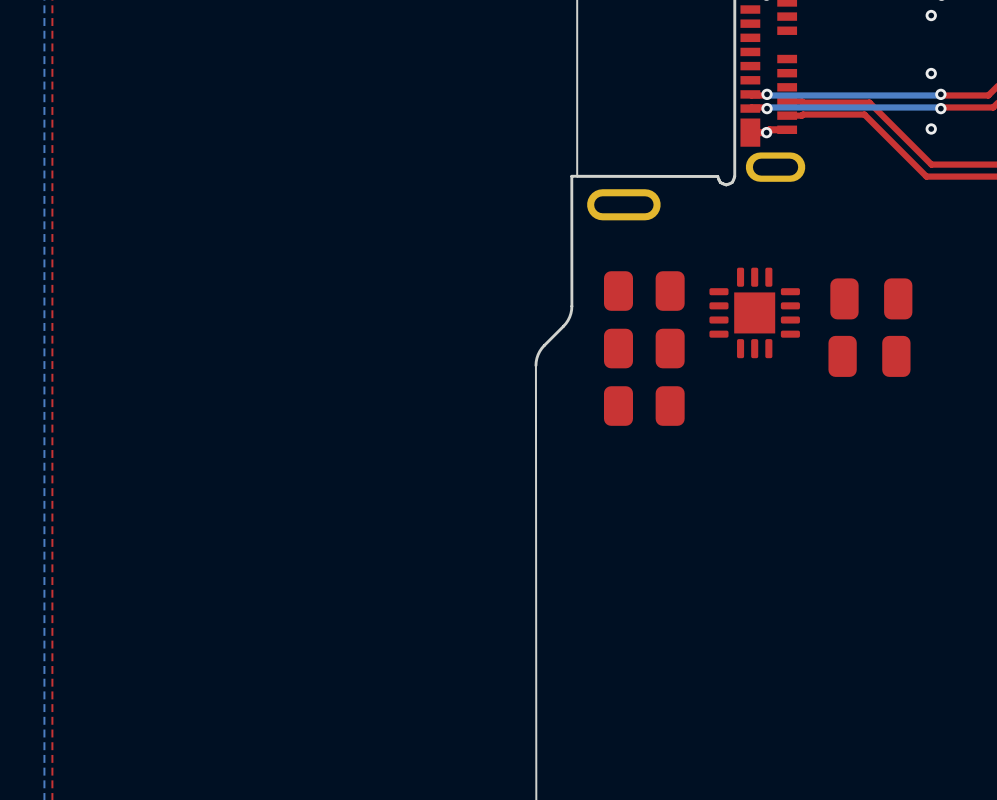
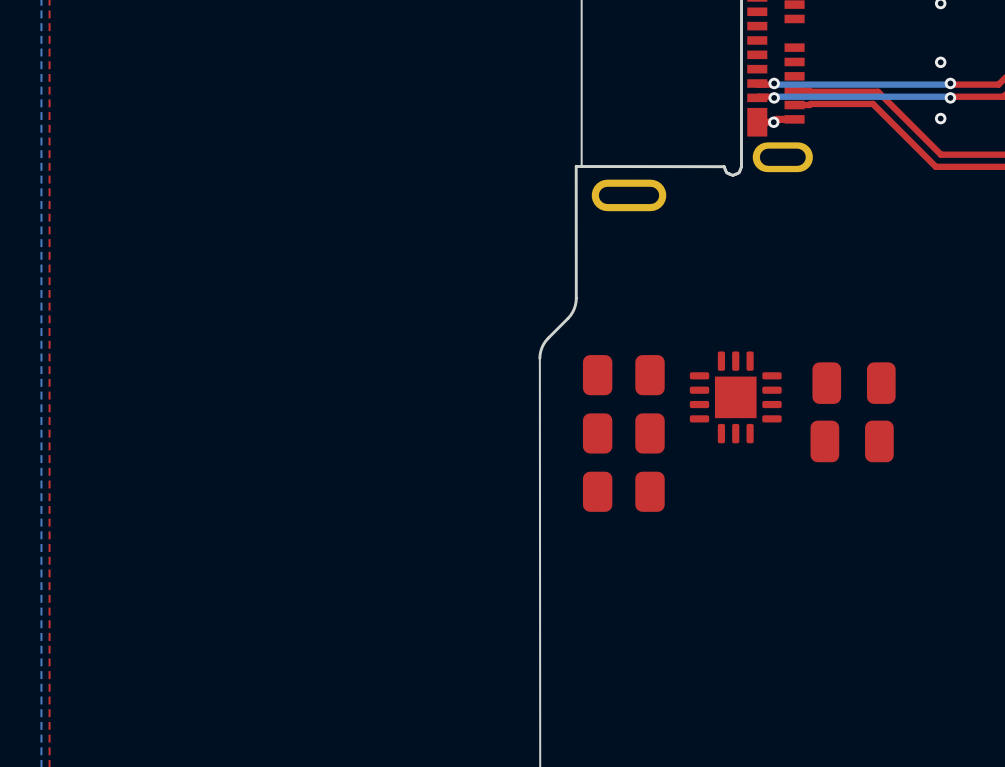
part: (644, 291) -> none
part: (871, 298) -> none
part position: (754, 312) -> (735, 397)
part: (644, 348) -> none
part position: (869, 356) -> (854, 383)
part: none -> (623, 375)
part: (644, 406) -> none
part: none -> (623, 433)
part: none -> (852, 441)
part: none -> (623, 491)

